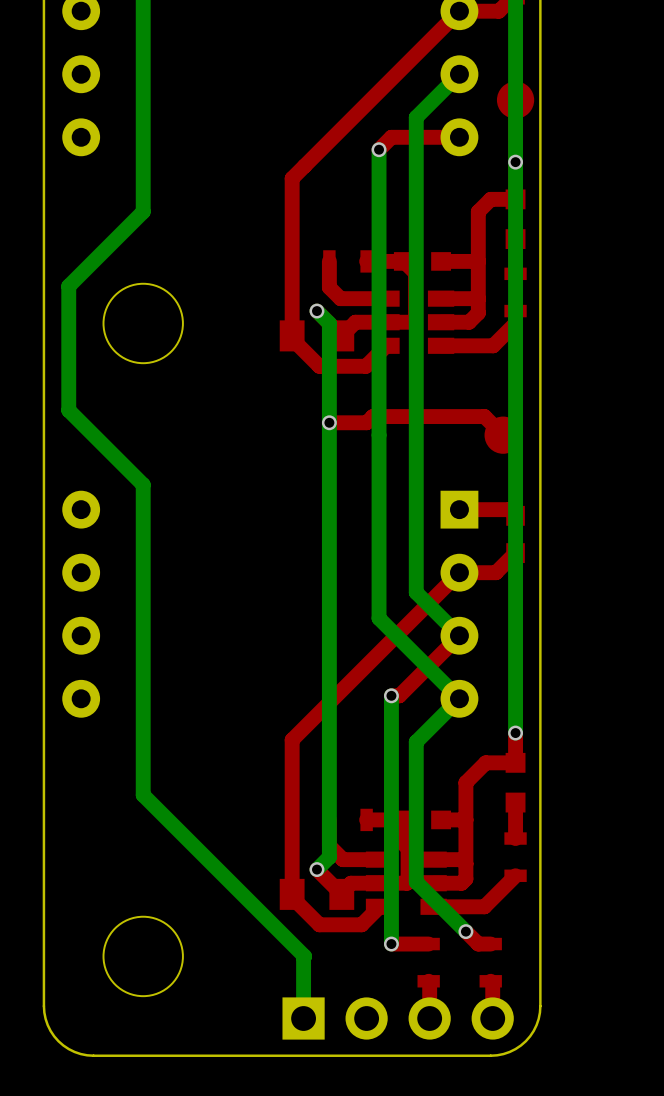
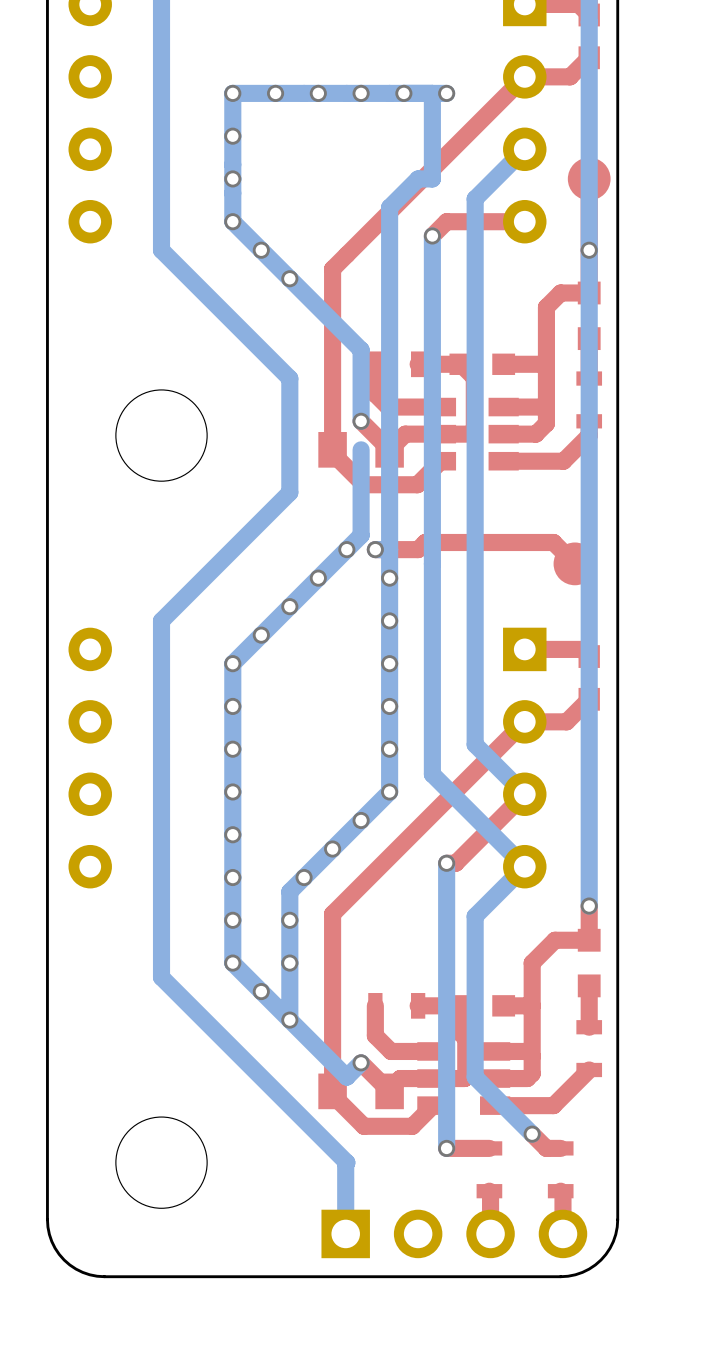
via: none -> (232, 93)
via: none -> (275, 93)
via: none -> (318, 93)
via: none -> (361, 93)
via: none -> (403, 93)
bottom track: none -> (432, 93) (432, 178) (418, 178) (389, 207) (389, 791) (289, 891) (289, 1020)
bottom track: none -> (446, 93) (232, 93) (232, 221) (361, 350) (361, 421)
via: none -> (446, 93)
via: none -> (232, 136)
via: none -> (232, 178)
via: none -> (232, 221)
bottom track: (143, 162) (143, 211) (68, 286) (68, 410) (143, 484) -> (161, 250) (289, 378) (289, 492) (161, 620)
via: none -> (261, 250)
via: none -> (289, 278)
bottom track: (316, 311) (329, 323) (329, 857) (316, 869) -> (361, 449) (361, 535) (232, 663) (232, 963) (346, 1077) (361, 1062)
via: none -> (346, 549)
via: none -> (318, 578)
via: none -> (389, 578)
via: none -> (289, 606)
via: none -> (389, 620)
via: none -> (261, 635)
via: none -> (232, 663)
via: none -> (389, 663)
via: none -> (232, 706)
via: none -> (389, 706)
via: none -> (232, 749)
via: none -> (389, 749)
via: none -> (232, 791)
via: none -> (389, 791)
via: none -> (361, 820)
via: none -> (232, 834)
via: none -> (332, 849)
via: none -> (232, 877)
via: none -> (304, 877)
via: none -> (232, 920)
via: none -> (289, 920)
via: none -> (232, 963)
via: none -> (289, 963)
via: none -> (261, 991)
via: none -> (289, 1020)

